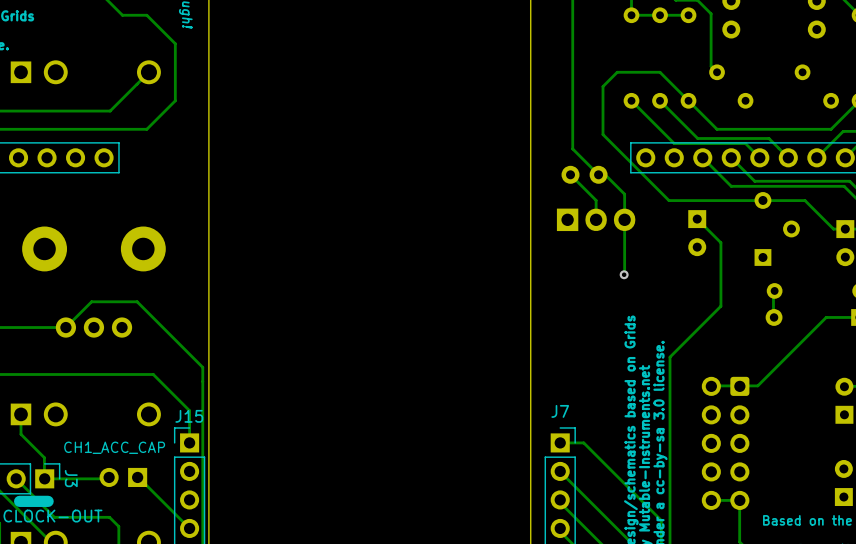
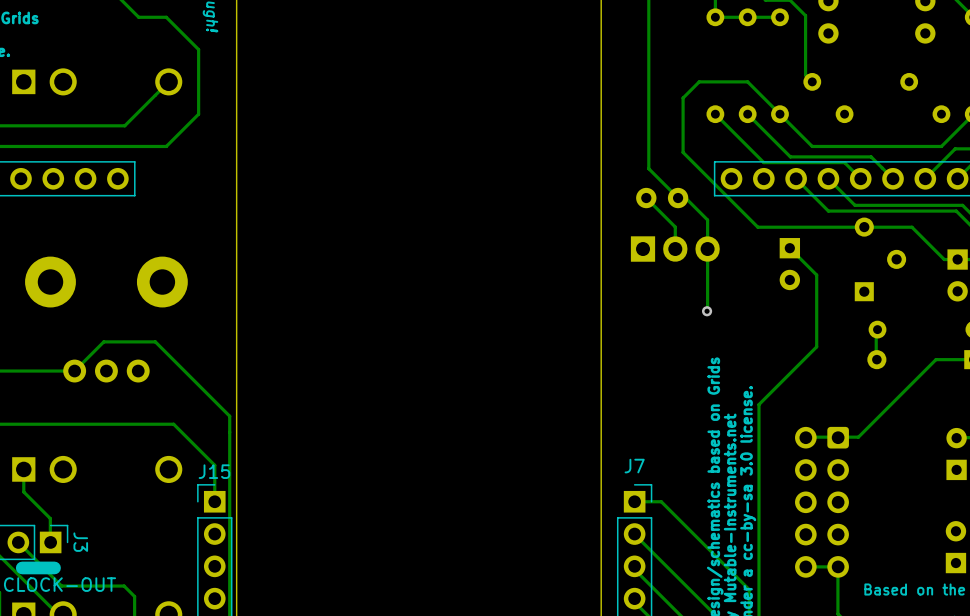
track: (109, 477) (44, 478) -> none
CH1_ACC_CAP: (123, 477) -> none
track: (137, 477) (189, 528) -> none

